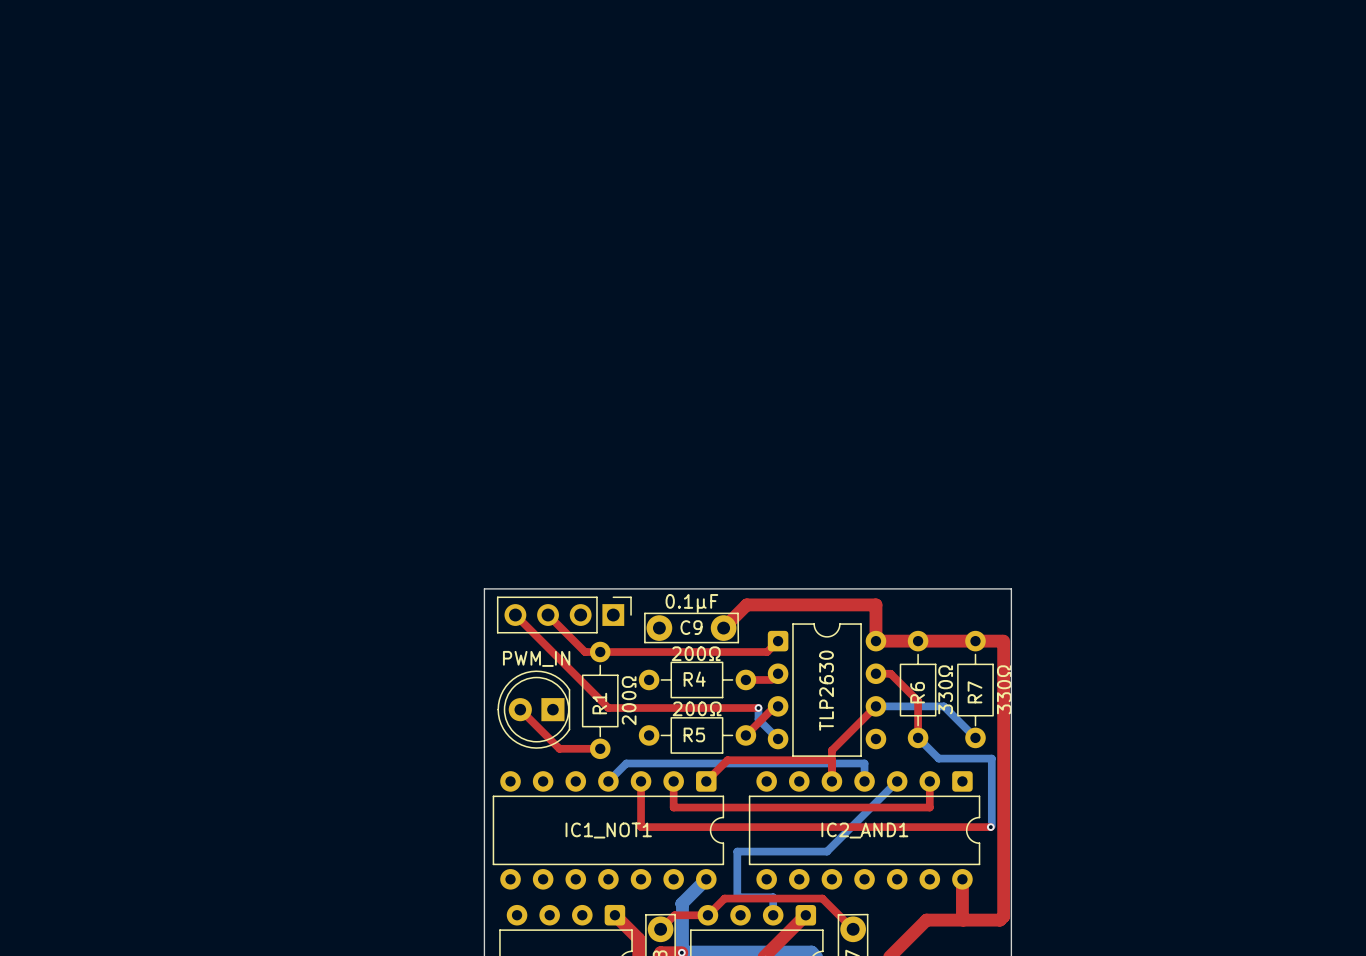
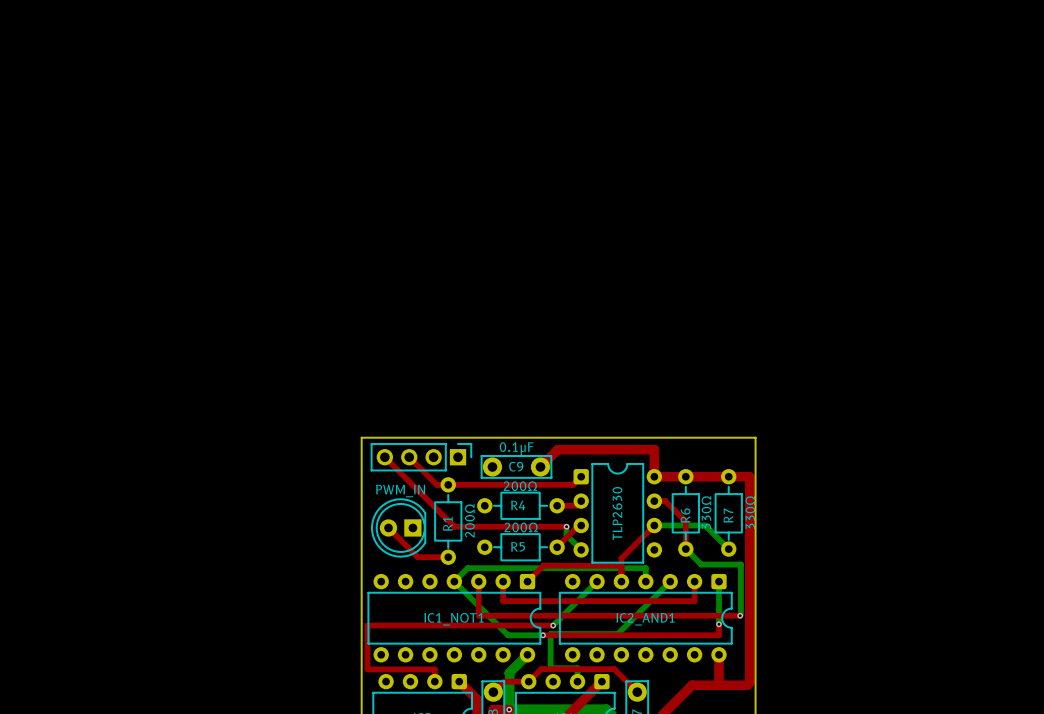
bottom track: none -> (454, 581) (508, 635) (543, 635)
bottom track: none -> (597, 581) (553, 625)
bottom track: none -> (718, 581) (718, 624)
top track: none -> (718, 624) (718, 635) (543, 635)
via: none -> (718, 624)
top track: none -> (553, 625) (367, 625) (367, 669) (434, 669) (434, 681)
via: none -> (553, 625)
via: none -> (543, 635)

